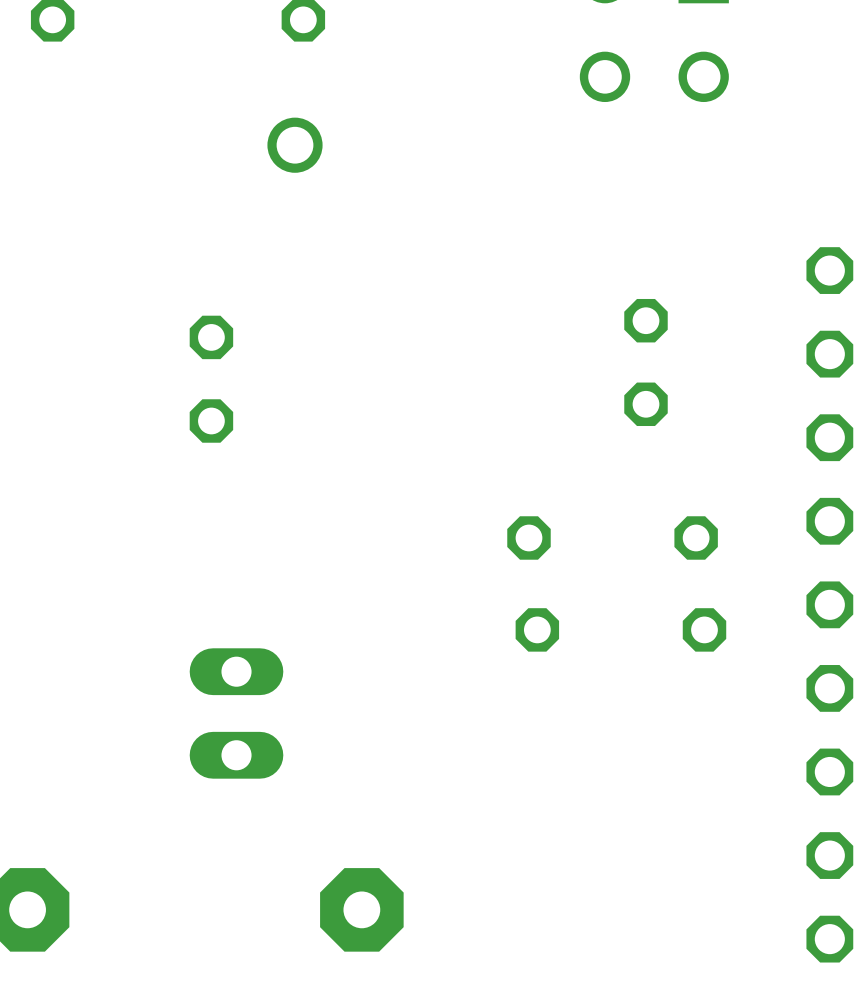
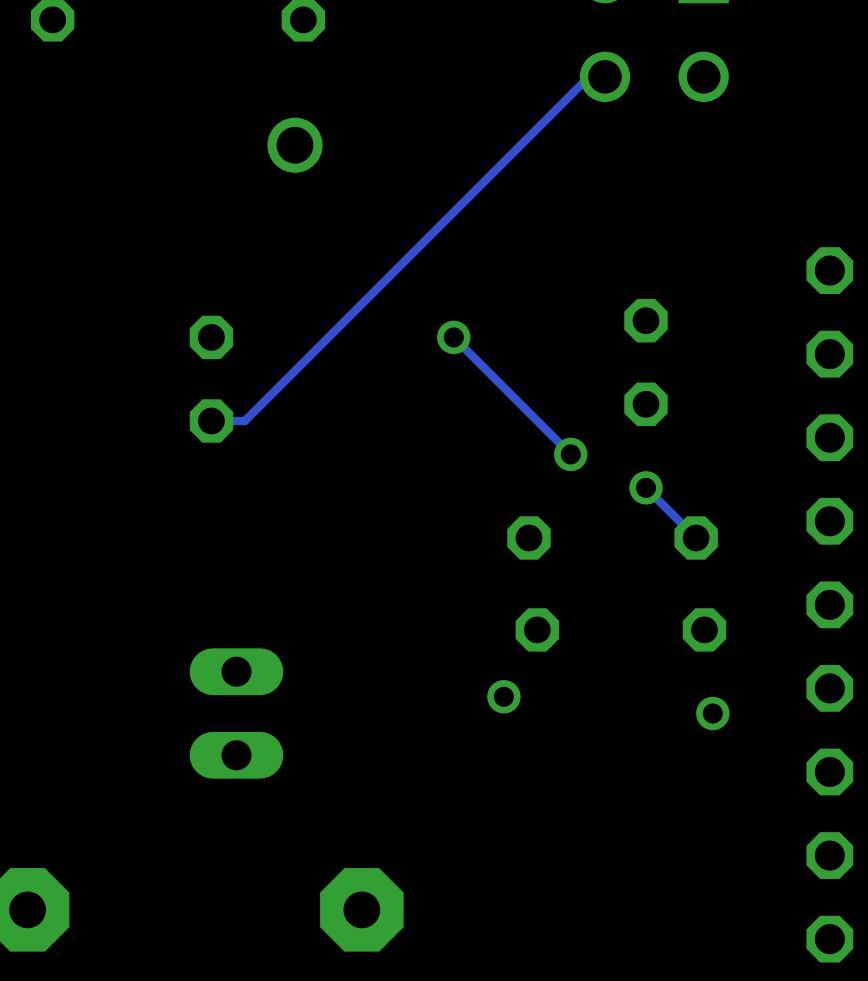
track: none -> (605, 76) (587, 78) (244, 420) (211, 420)
track: none -> (453, 337) (570, 454)
via: none -> (453, 337)
via: none -> (570, 454)
track: none -> (645, 487) (696, 537)
via: none -> (645, 487)
via: none -> (503, 696)
via: none -> (712, 713)

